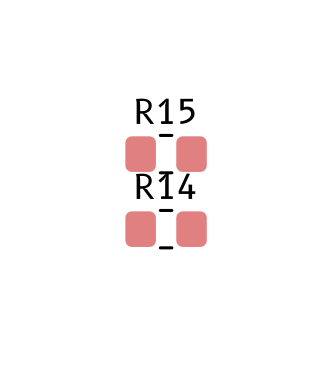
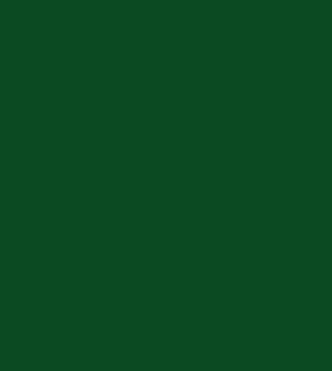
R15: (166, 154) -> none
R14: (166, 229) -> none

